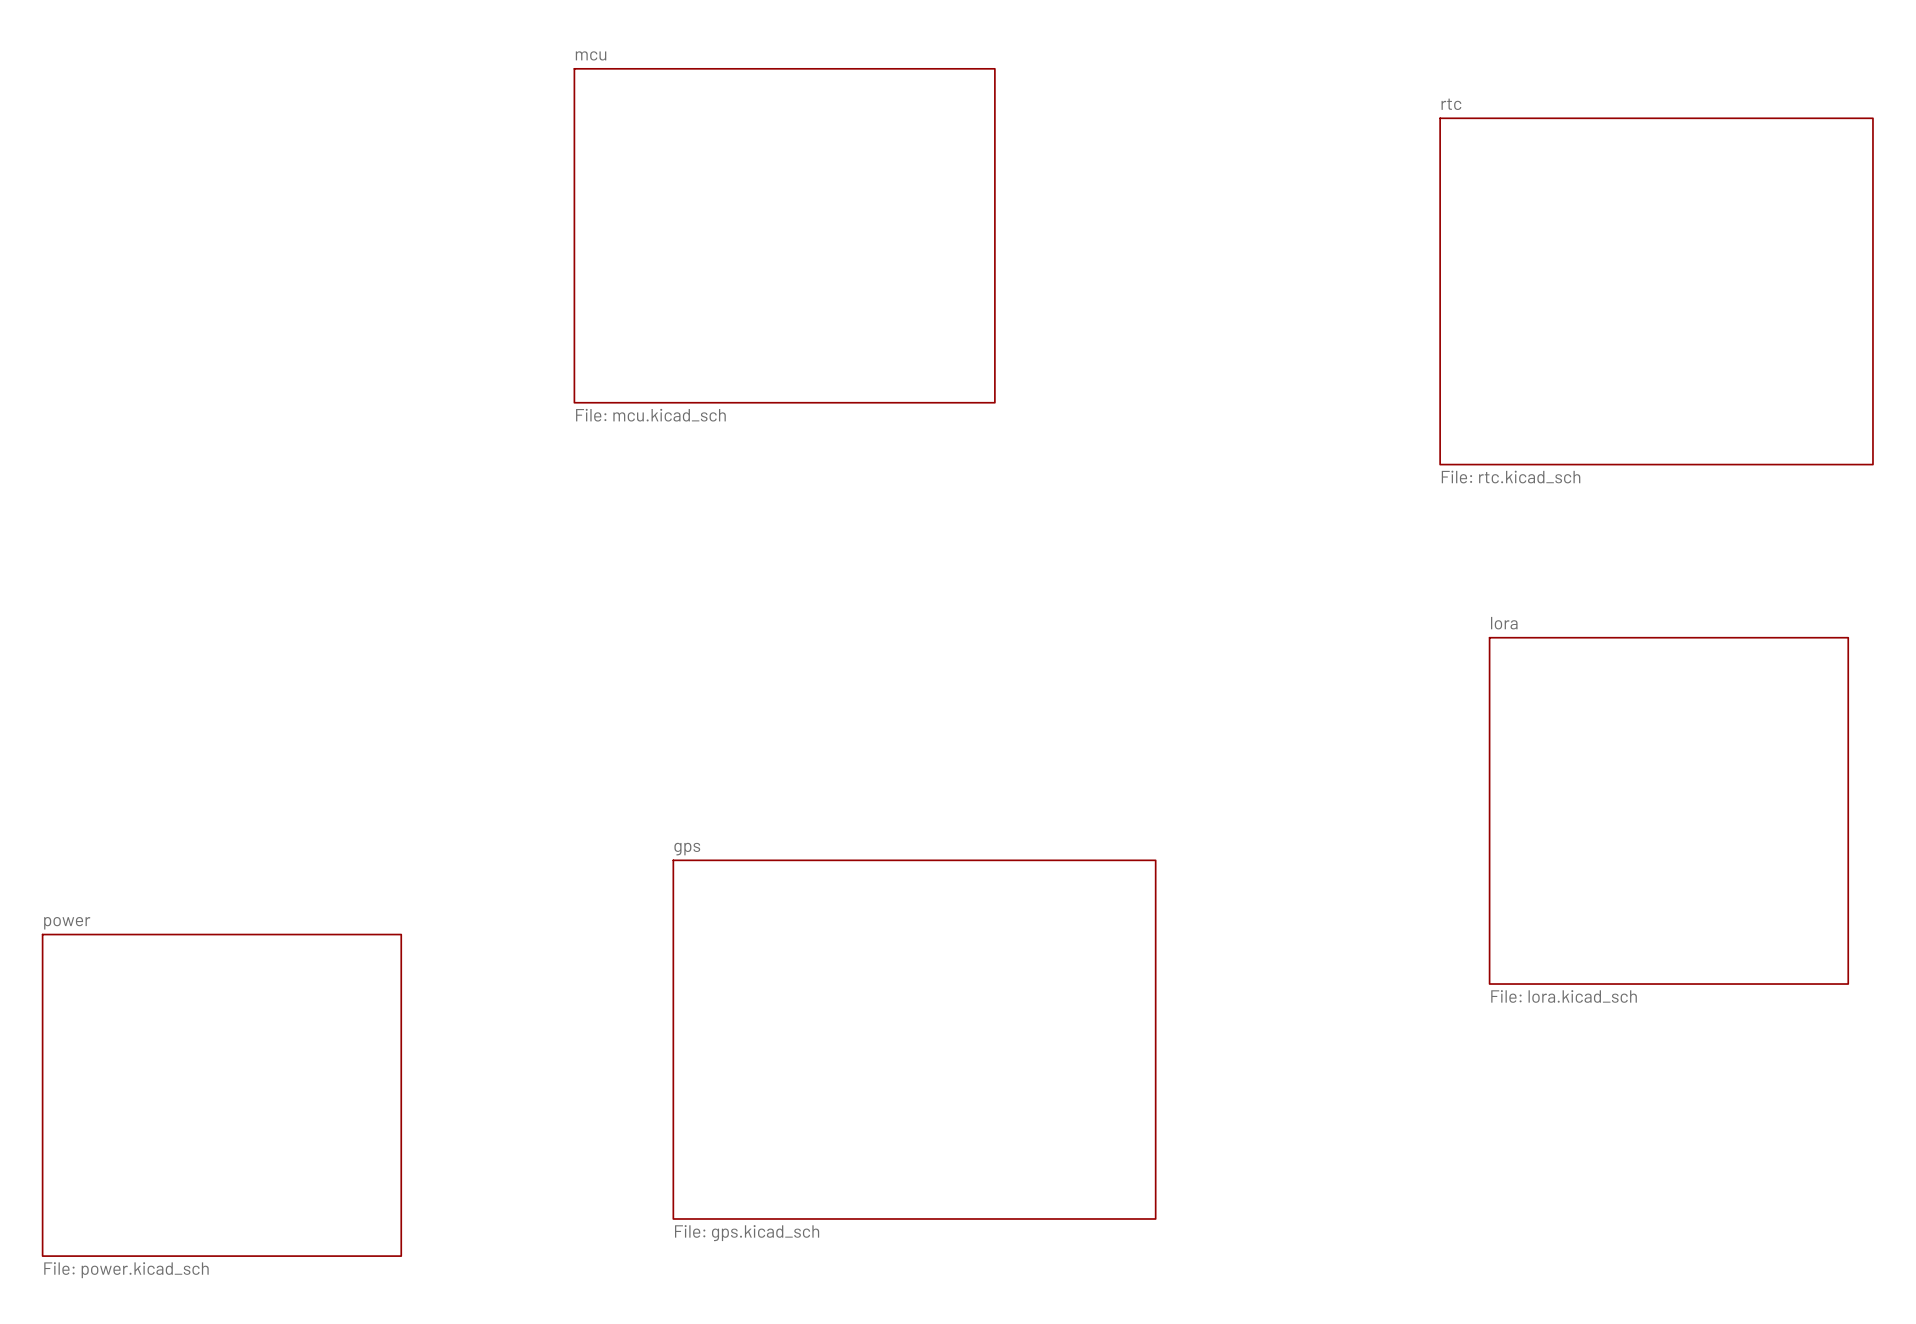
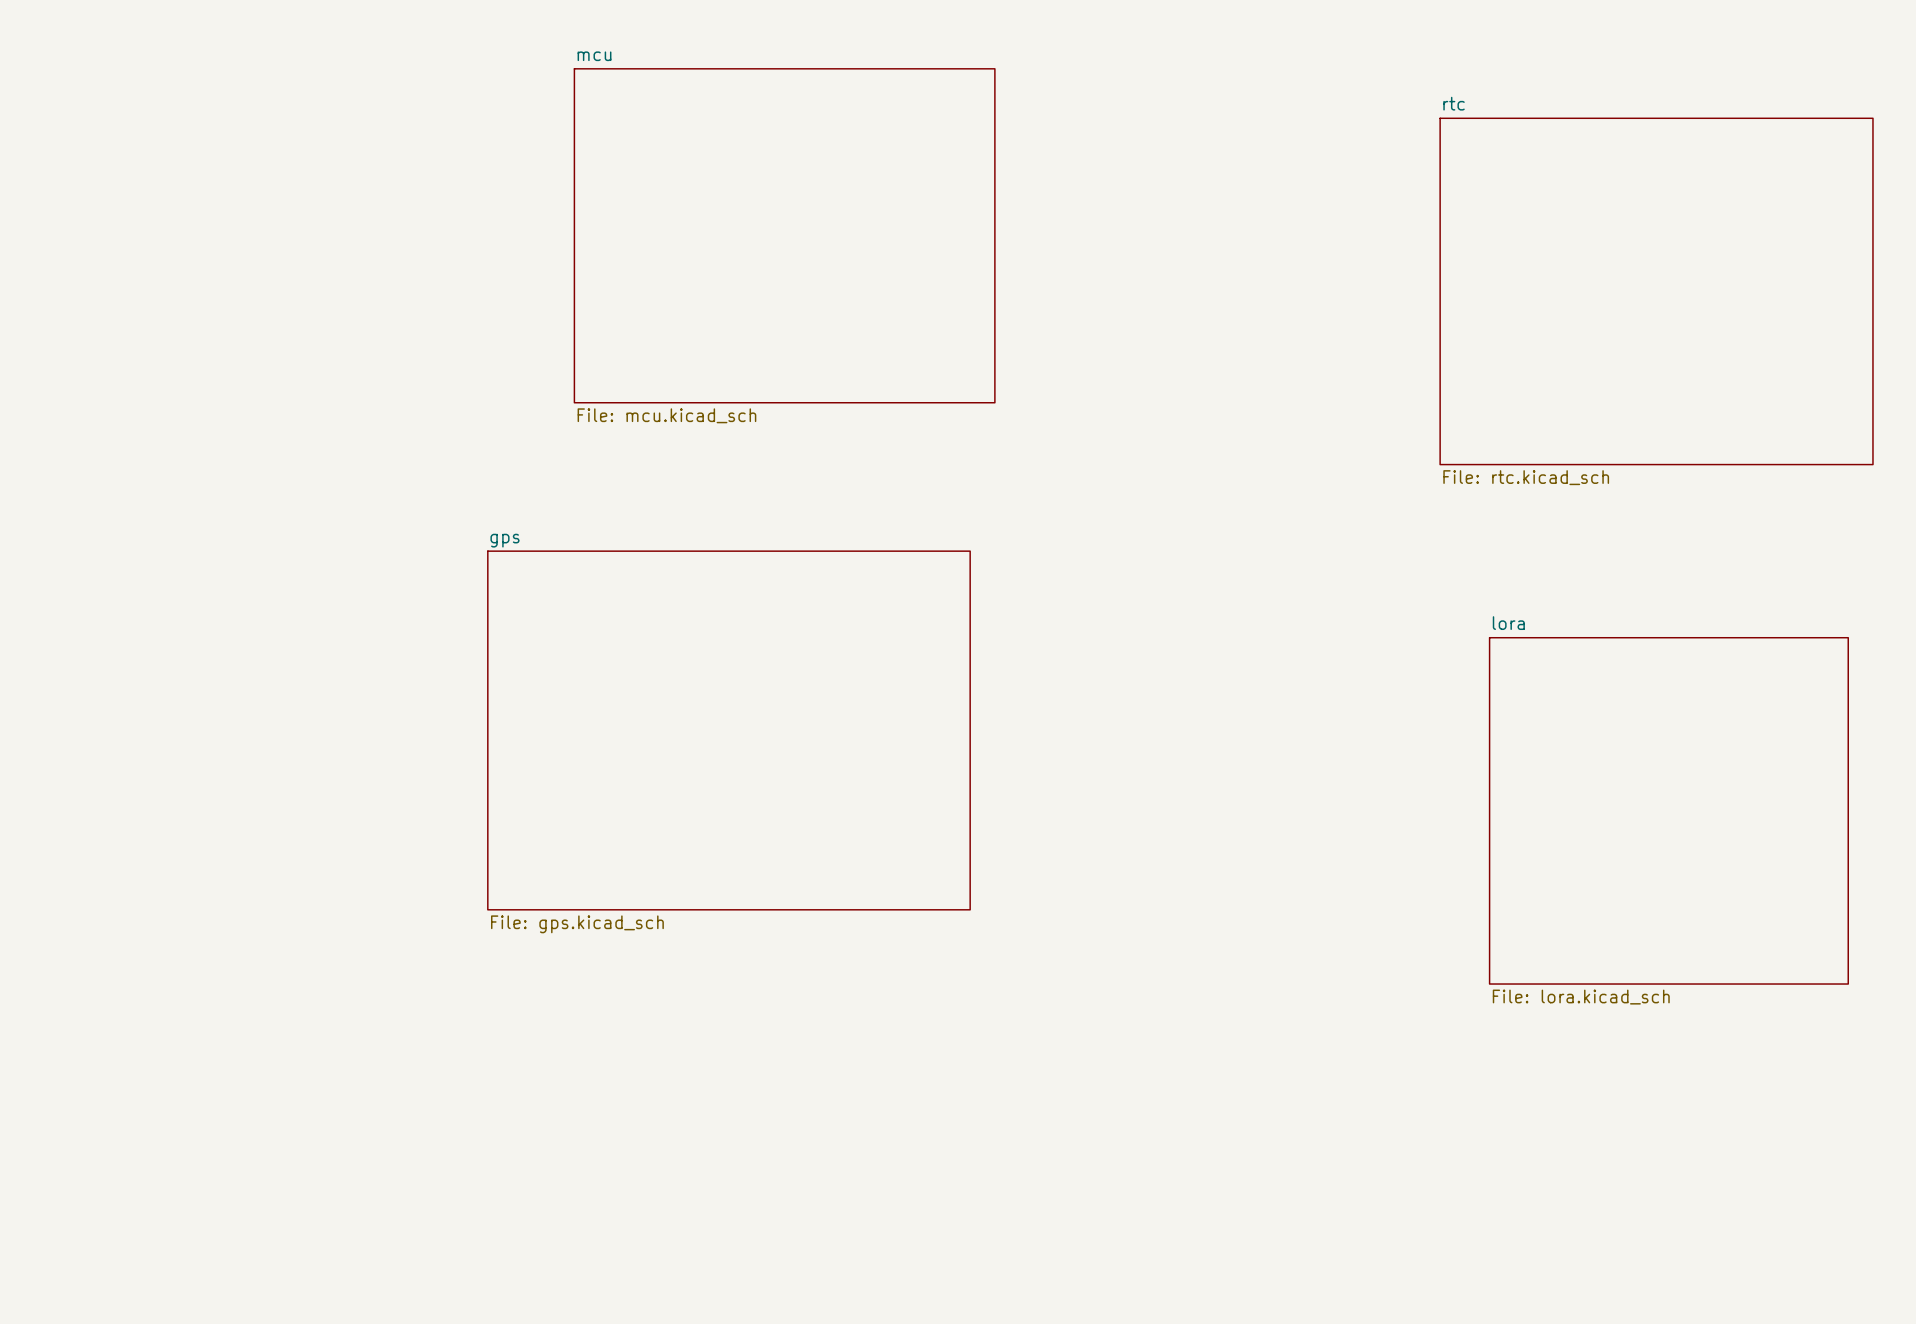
sheet gps: none -> File: gps.kicad_sch (728, 730)
sheet gps: File: gps.kicad_sch (914, 1039) -> none
sheet power: File: power.kicad_sch (221, 1095) -> none

